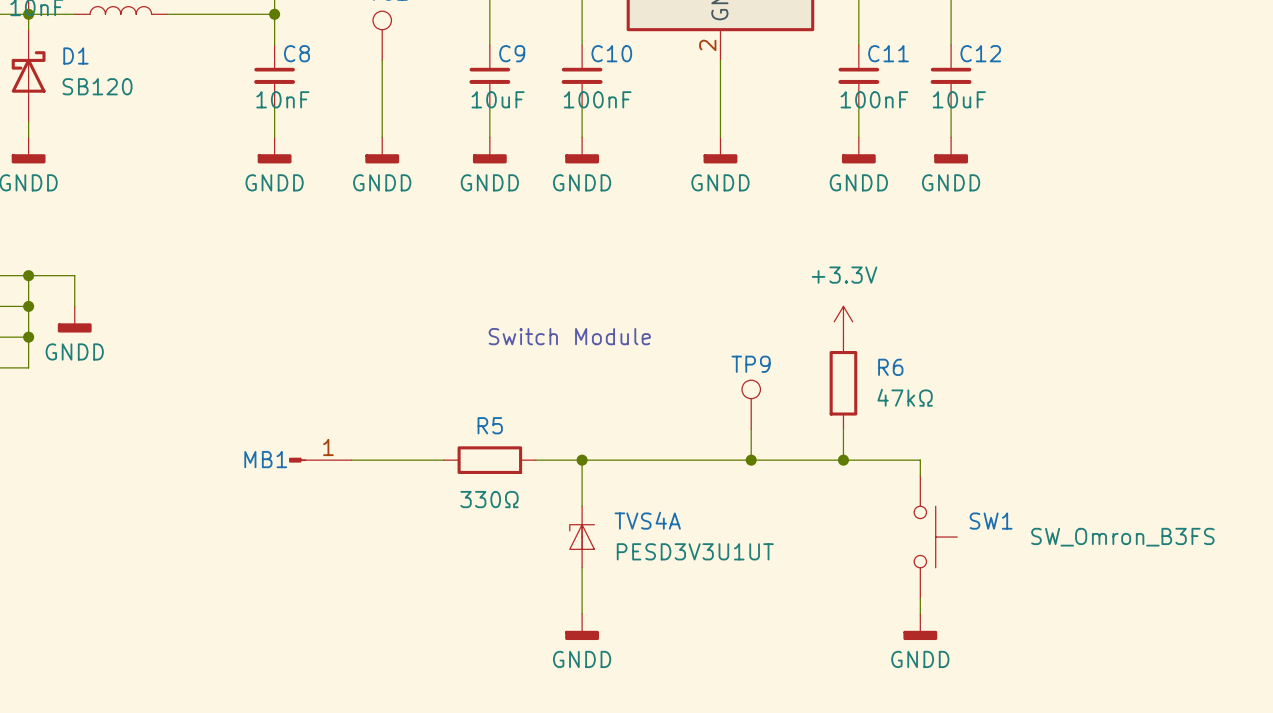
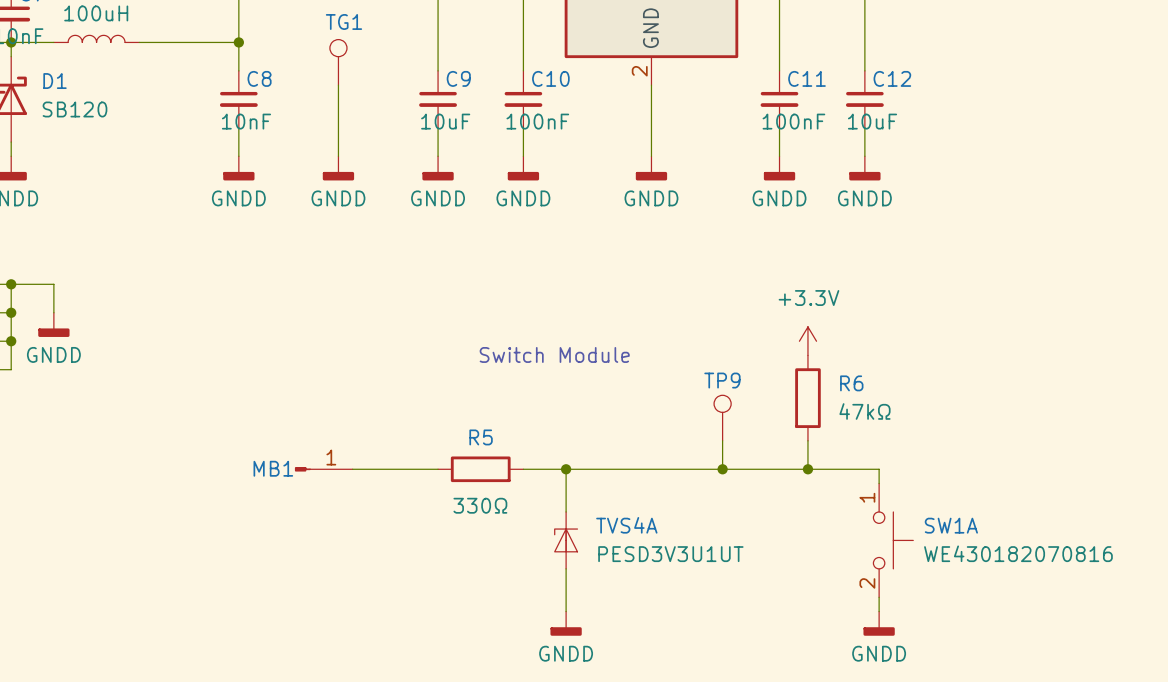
power symbol position: +3.3V (843, 321) -> +3.3V (807, 341)
text position: Switch Module (569, 336) -> Switch Module (554, 354)
R6 position: (843, 383) -> (807, 398)
TP9 position: (751, 404) -> (722, 418)
wire: (751, 429) (751, 460) -> (722, 440) (722, 469)
wire: (843, 429) (843, 460) -> (807, 440) (807, 469)
MB1 position: (320, 460) -> (323, 469)
wire: (351, 460) (443, 460) -> (352, 469) (438, 469)
R5 position: (489, 460) -> (480, 469)
wire: (535, 460) (920, 460) (920, 475) -> (523, 469) (879, 469) (879, 483)
wire: (582, 460) (582, 506) -> (566, 469) (566, 511)
junction position: (582, 460) -> (566, 469)
junction: (751, 460) -> none
junction: (843, 460) -> none
junction: none -> (722, 469)
junction: none -> (807, 469)
TVS4A position: (582, 537) -> (566, 540)
SW1: SW_Omron_B3FS (935, 537) -> none
SW1A: none -> WE430182070816 (893, 540)
wire: (582, 567) (582, 613) -> (566, 568) (566, 611)
wire: (920, 598) (920, 613) -> (879, 597) (879, 611)
power symbol position: GNDD (582, 626) -> GNDD (566, 623)
power symbol position: GNDD (920, 626) -> GNDD (879, 623)

